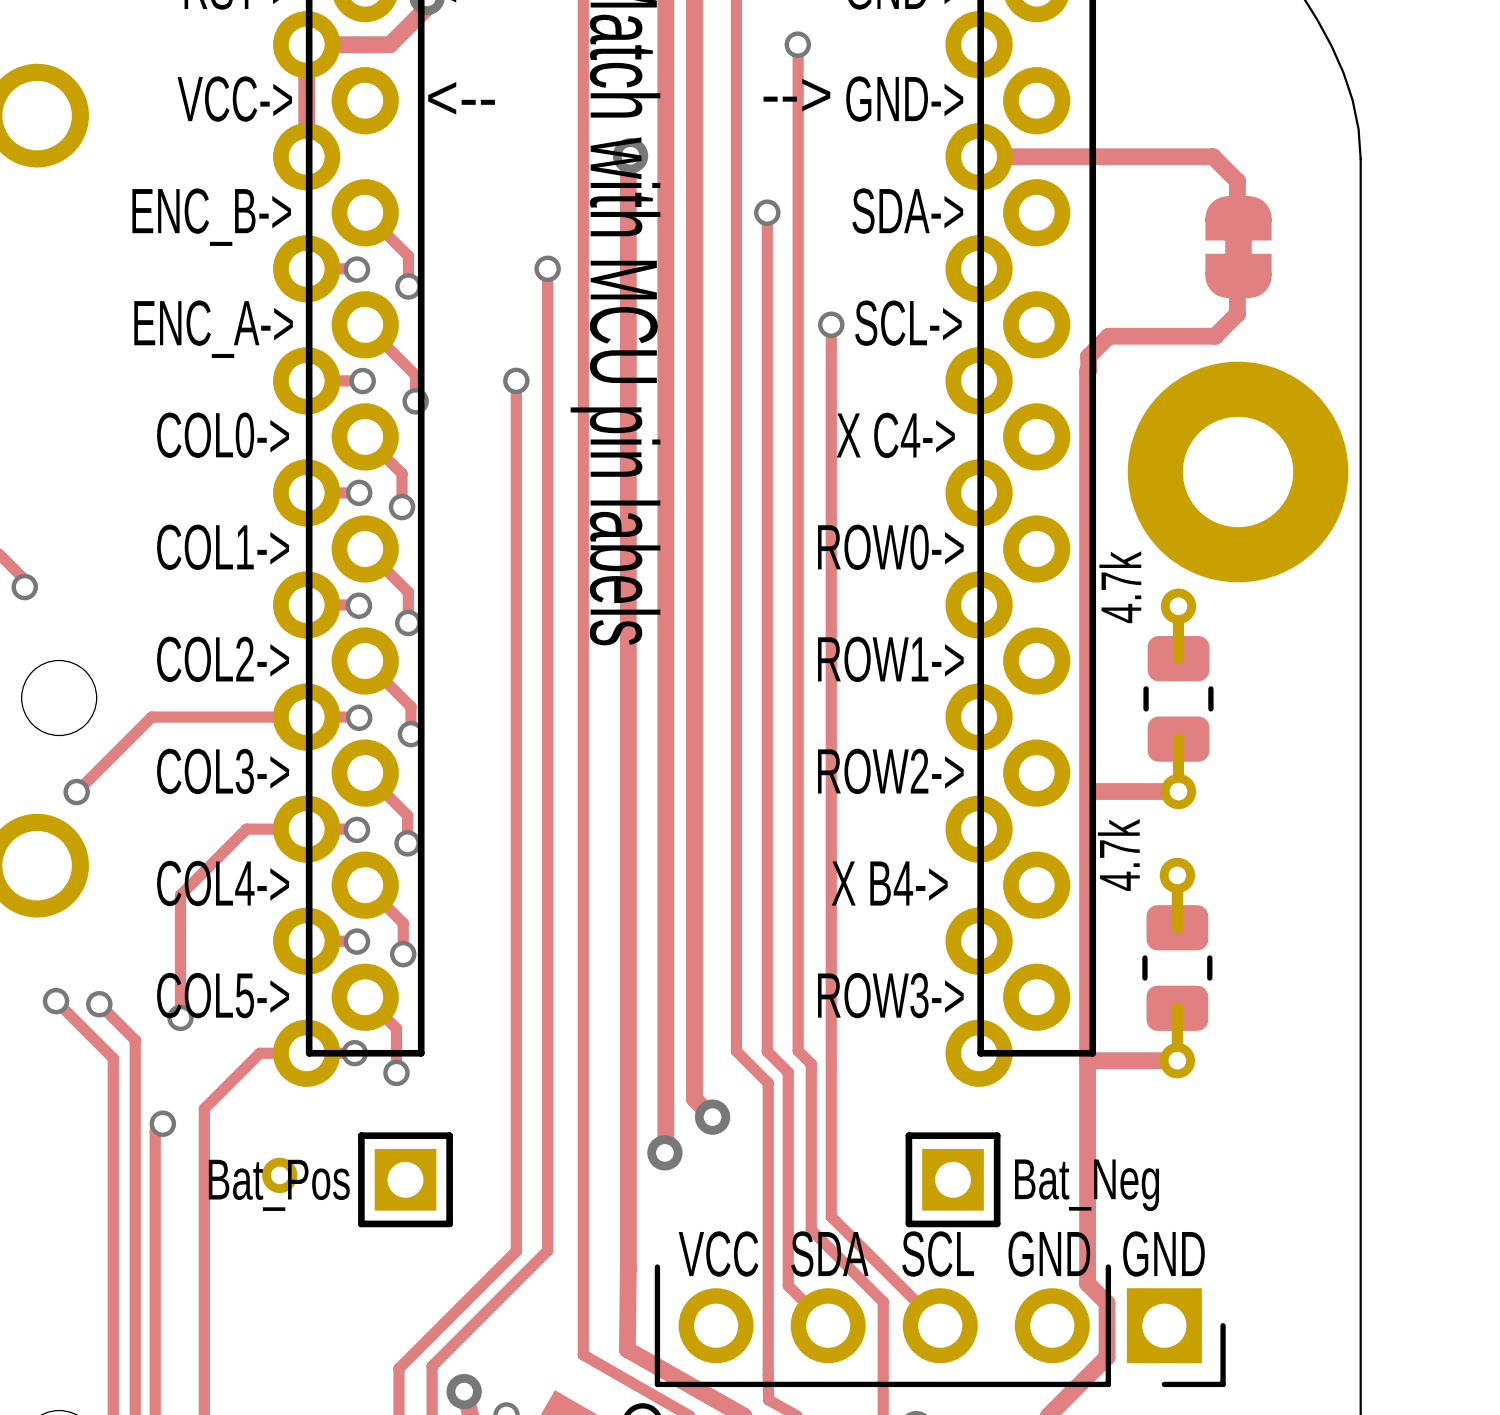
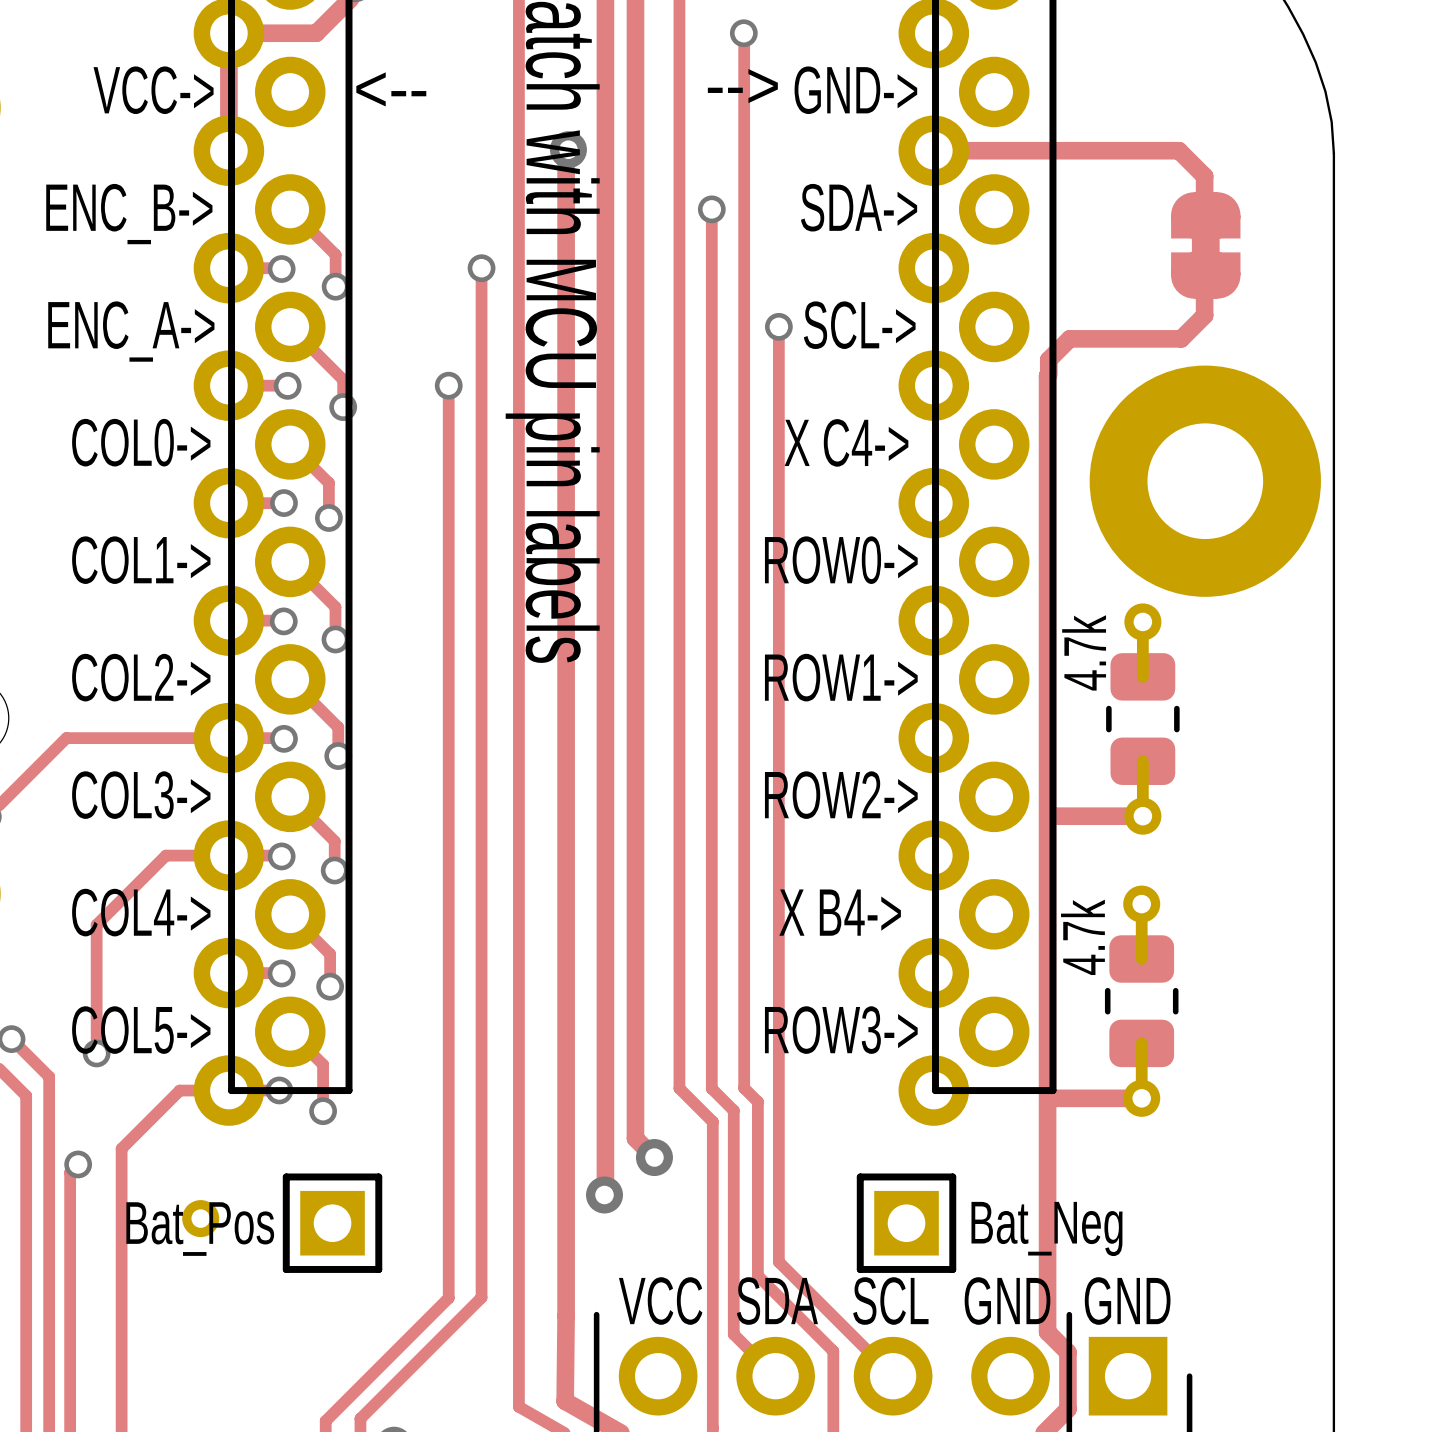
part value position: 4.7k (1120, 587) -> 4.7k (1084, 652)
part value position: 4.7k (1118, 855) -> 4.7k (1082, 937)

